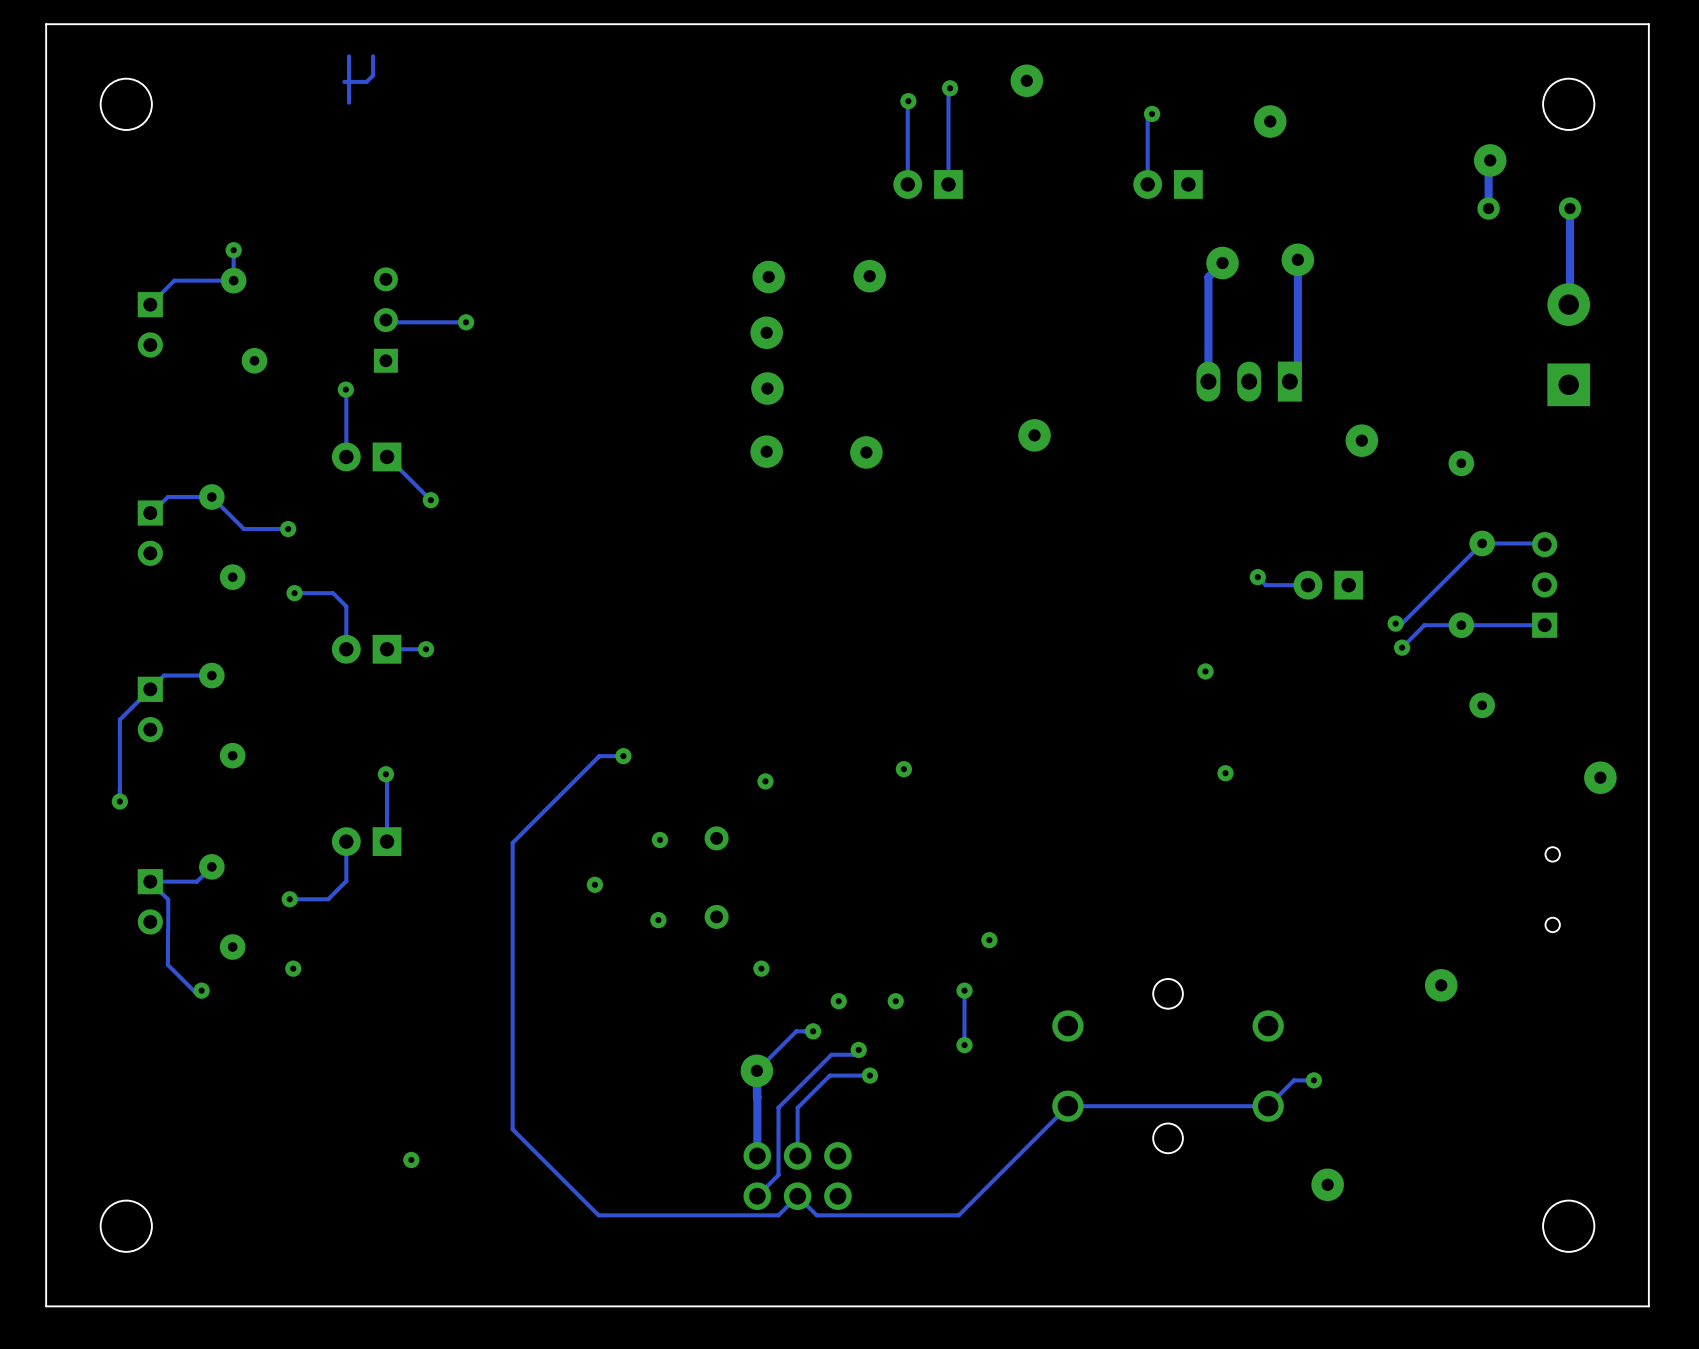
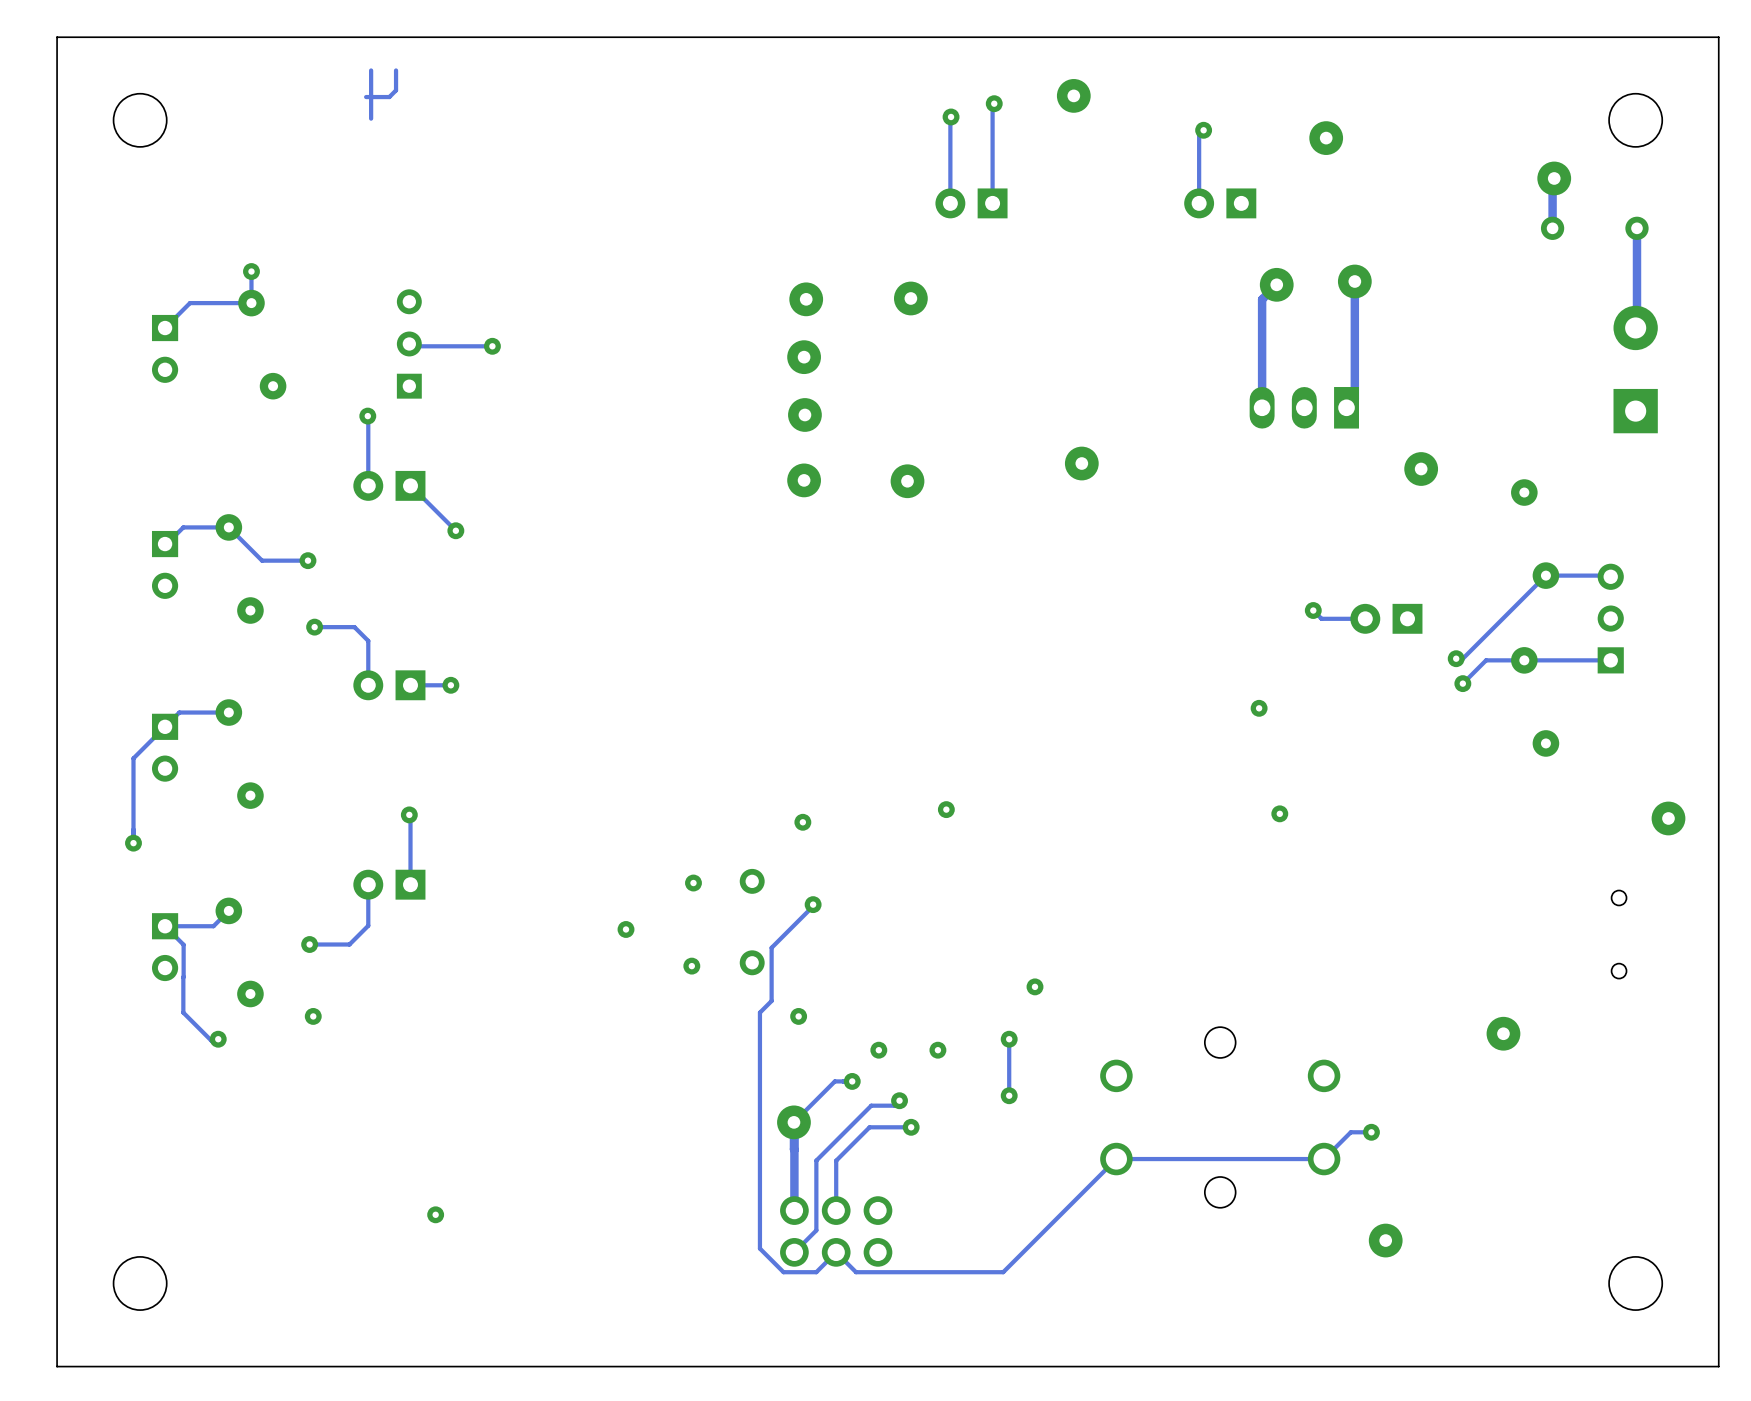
track: (623, 756) (599, 756) (512, 842) (512, 1129) (598, 1215) (746, 1215) -> (813, 906) (771, 947) (771, 1000) (759, 1012) (759, 1248) (783, 1272)
part position: (623, 756) -> (813, 904)

